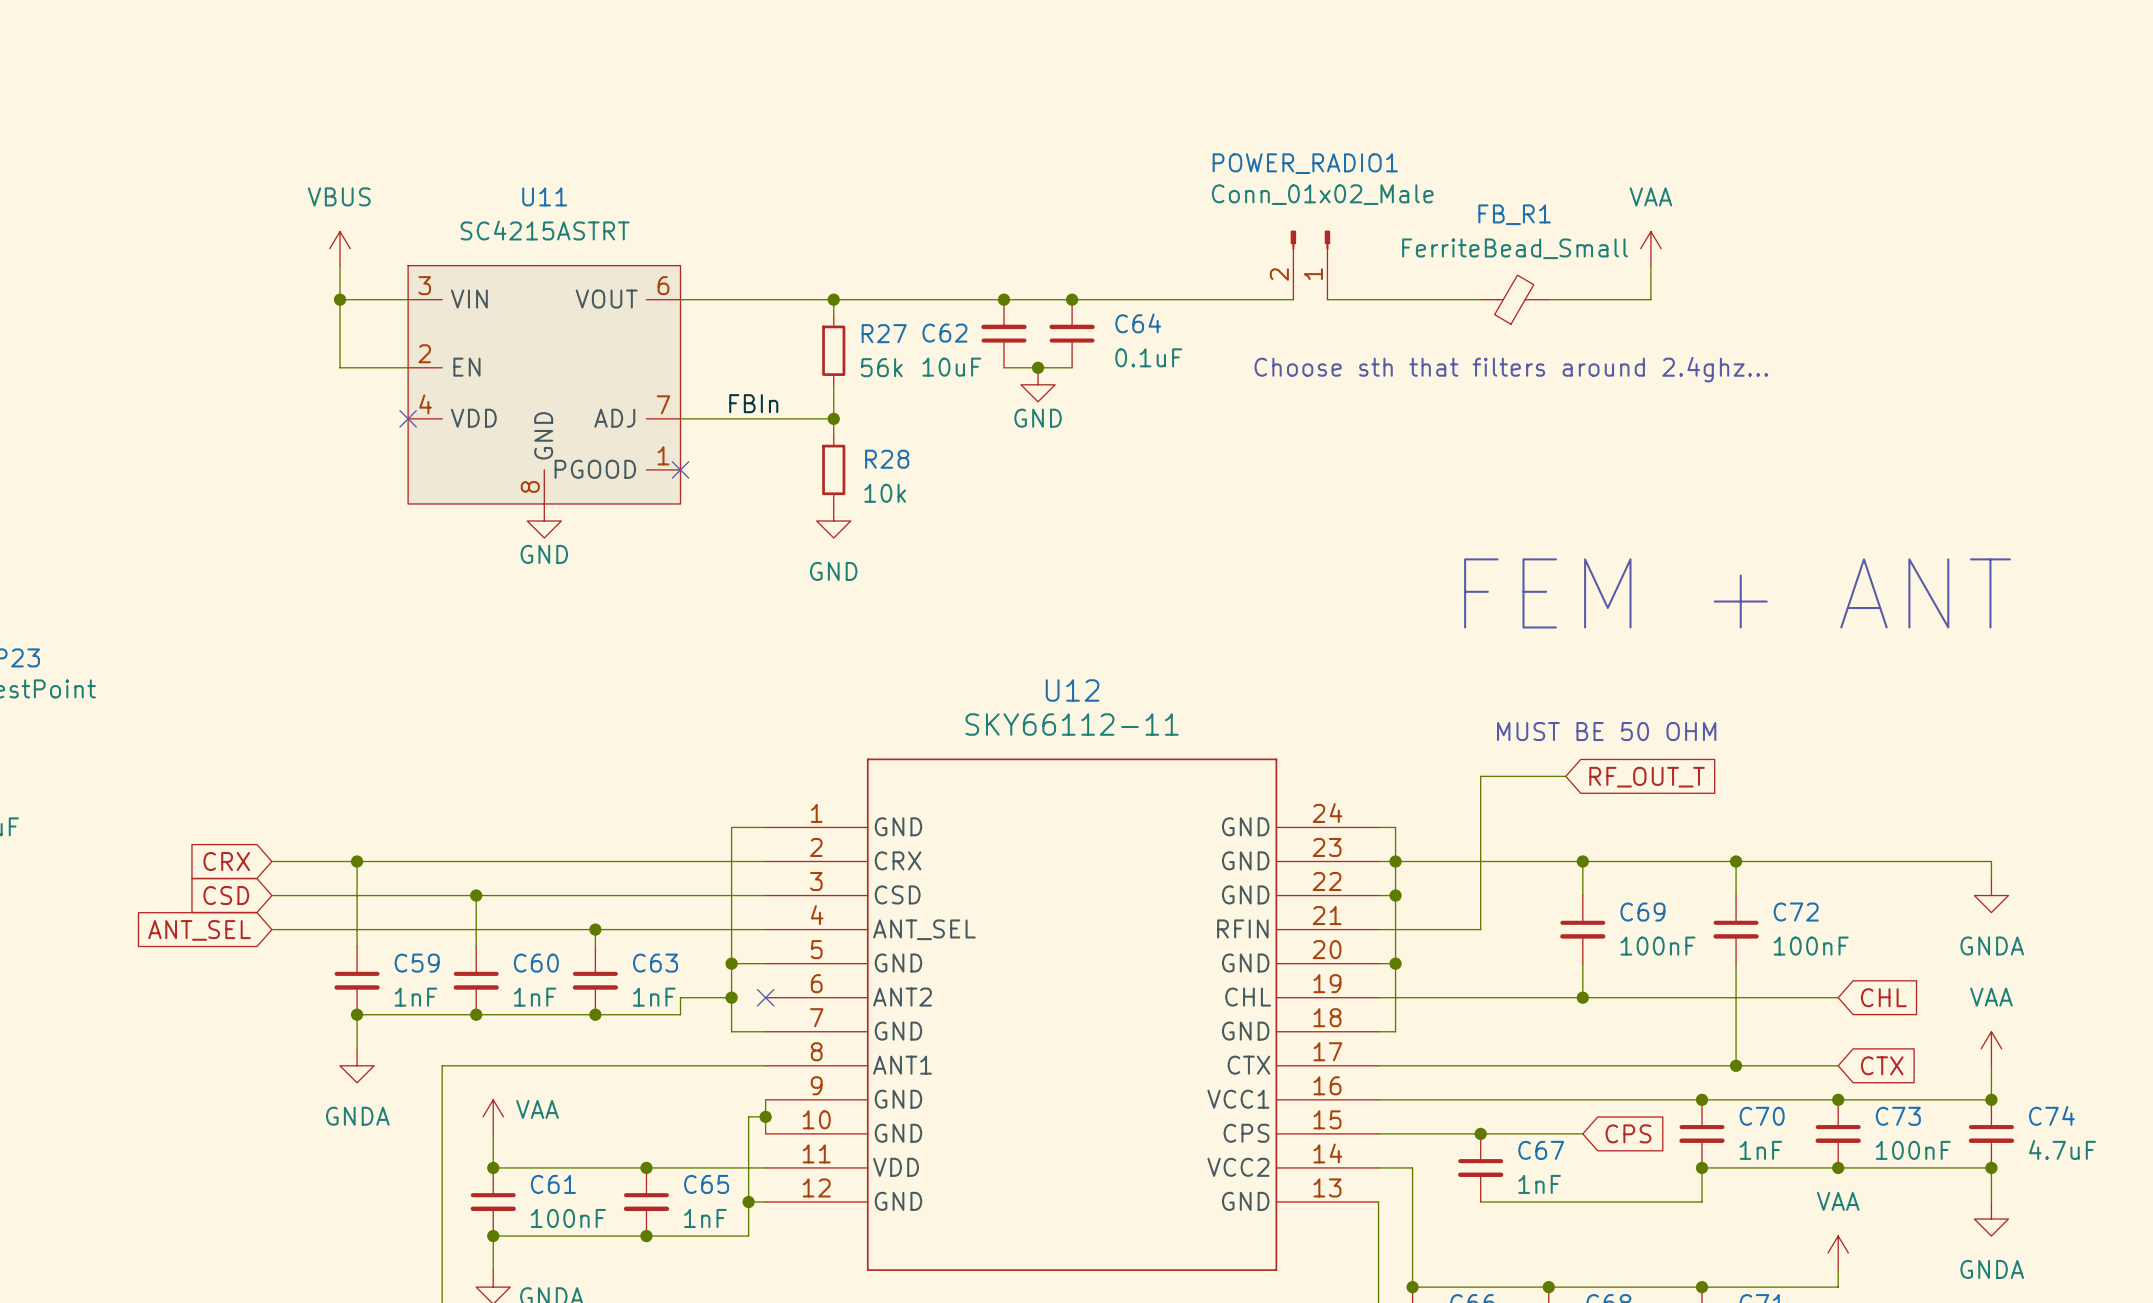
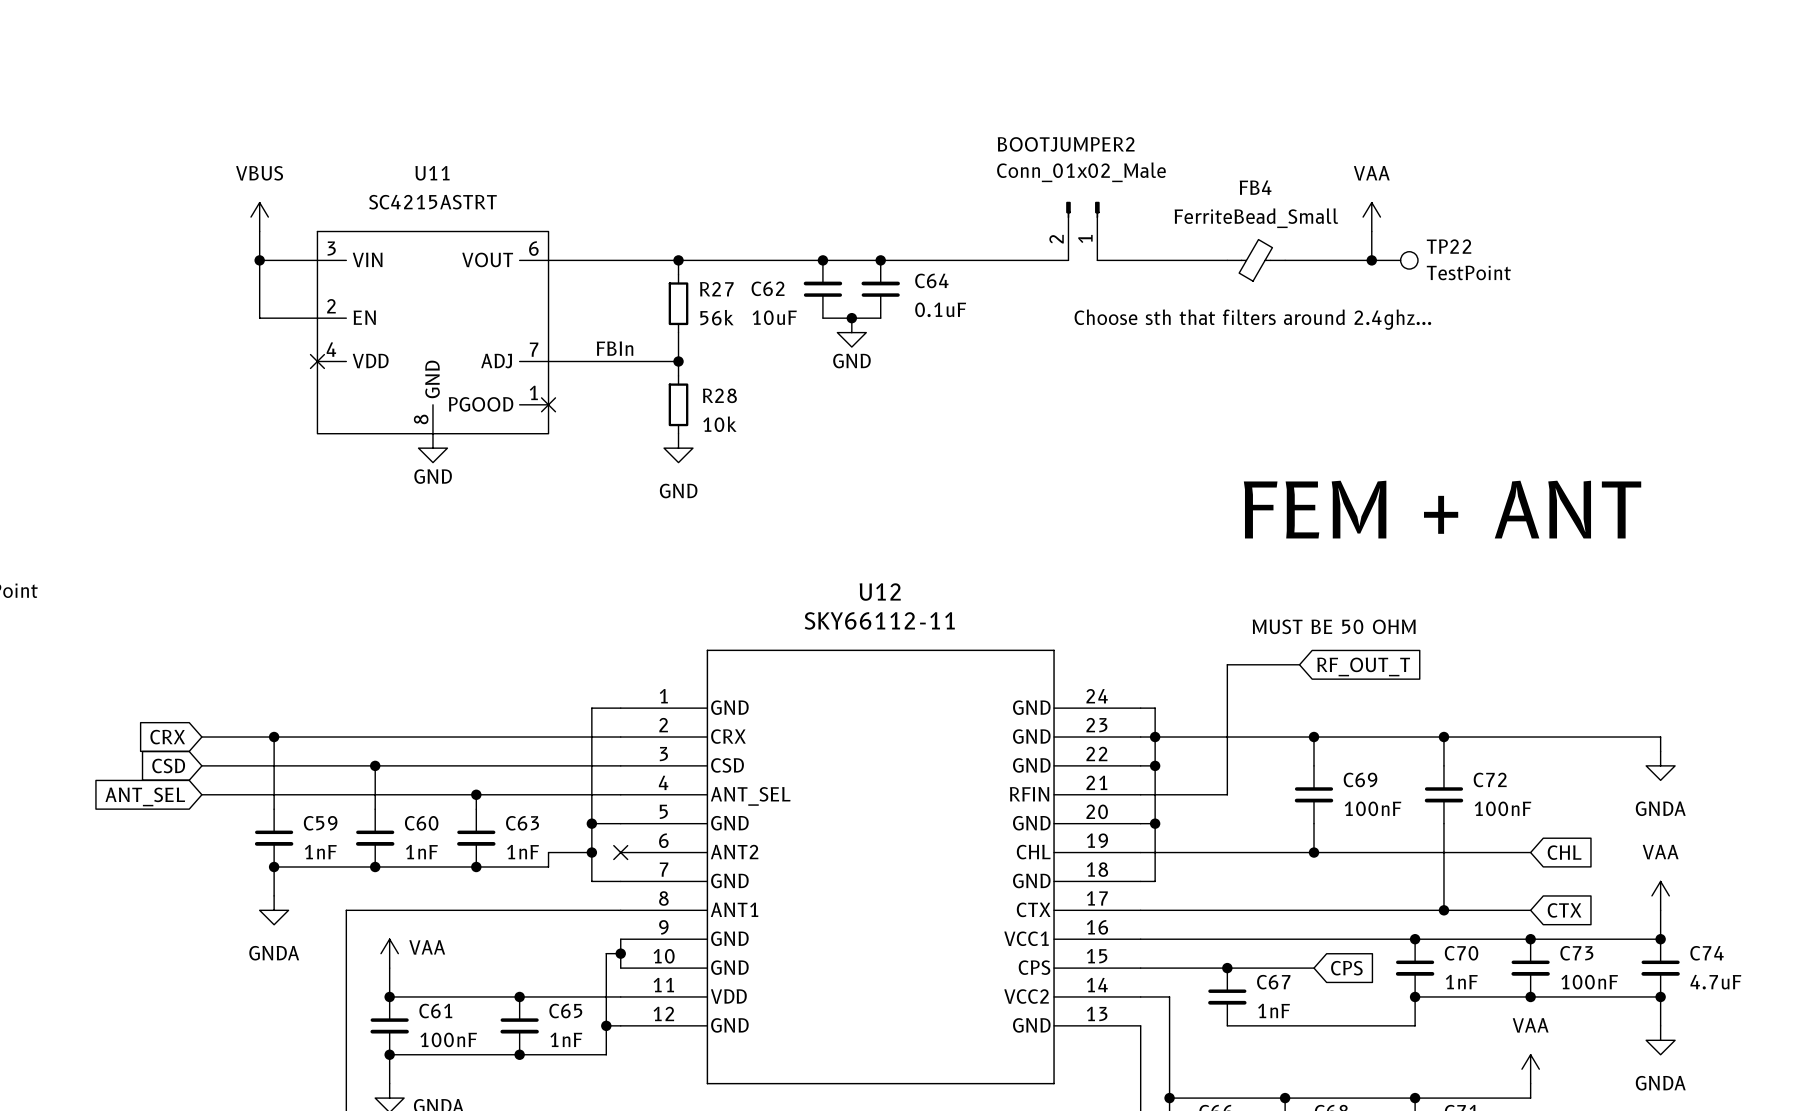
POWER_RADIO1 name: POWER_RADIO1 (1305, 163) -> BOOTJUMPER2 (1066, 144)
FB_R1 name: FB_R1 (1514, 214) -> FB4 (1255, 187)
junction: none -> (1371, 260)
TP22: none -> TestPoint (1394, 260)

